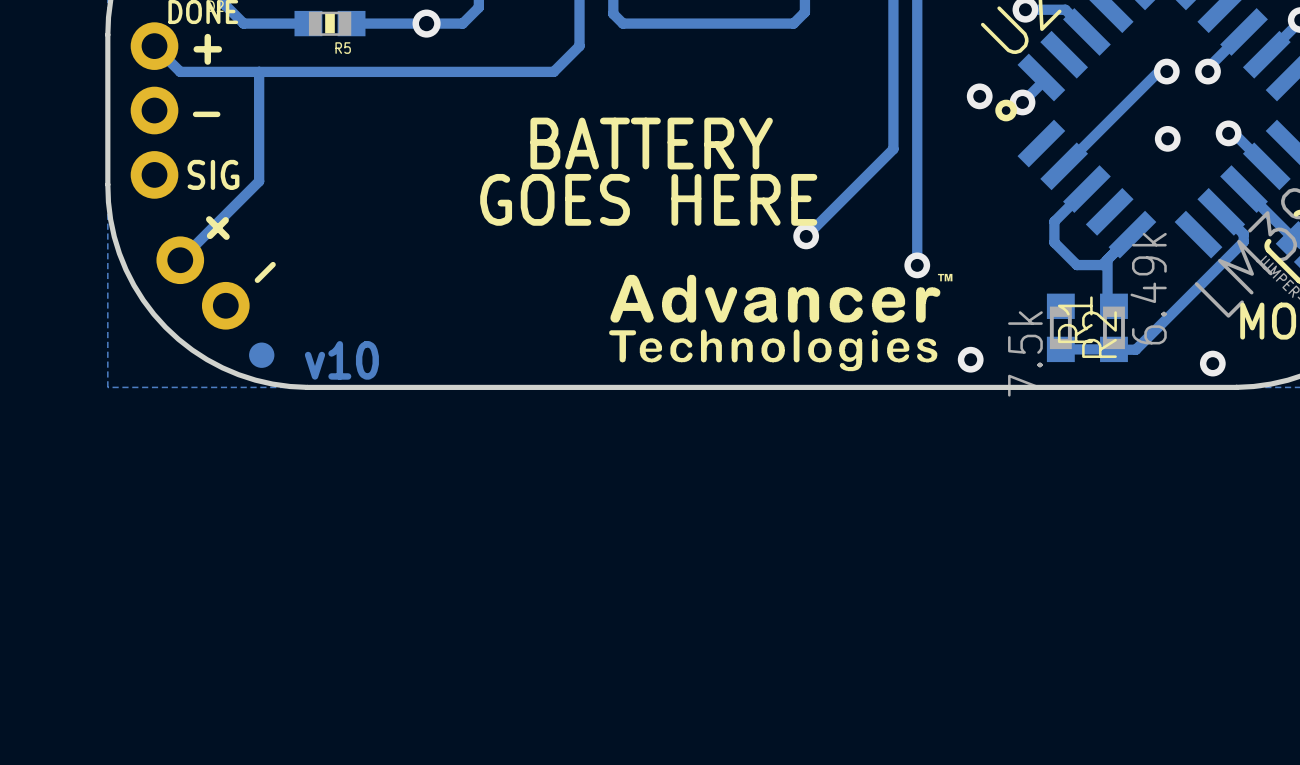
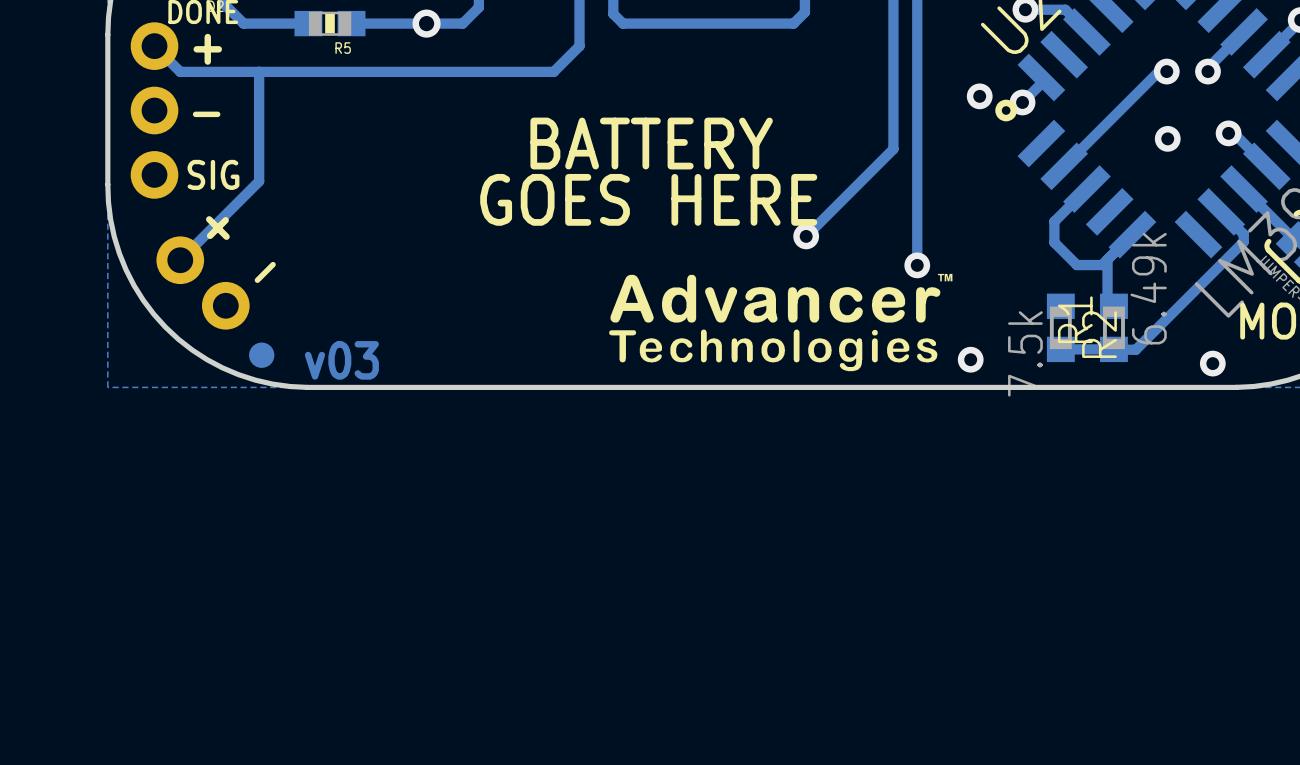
text: v10 (341, 360) -> v03 (341, 360)

